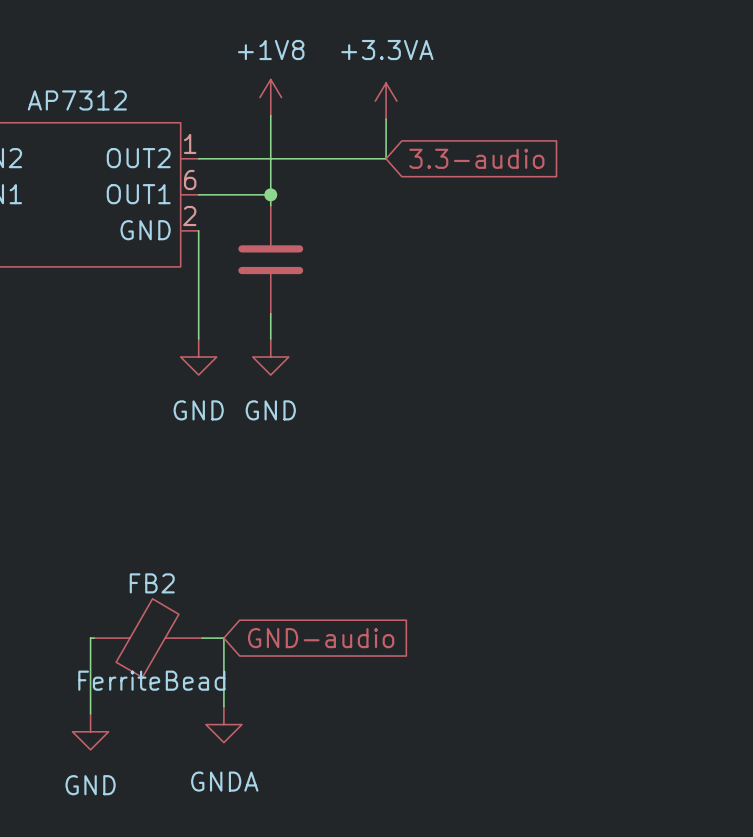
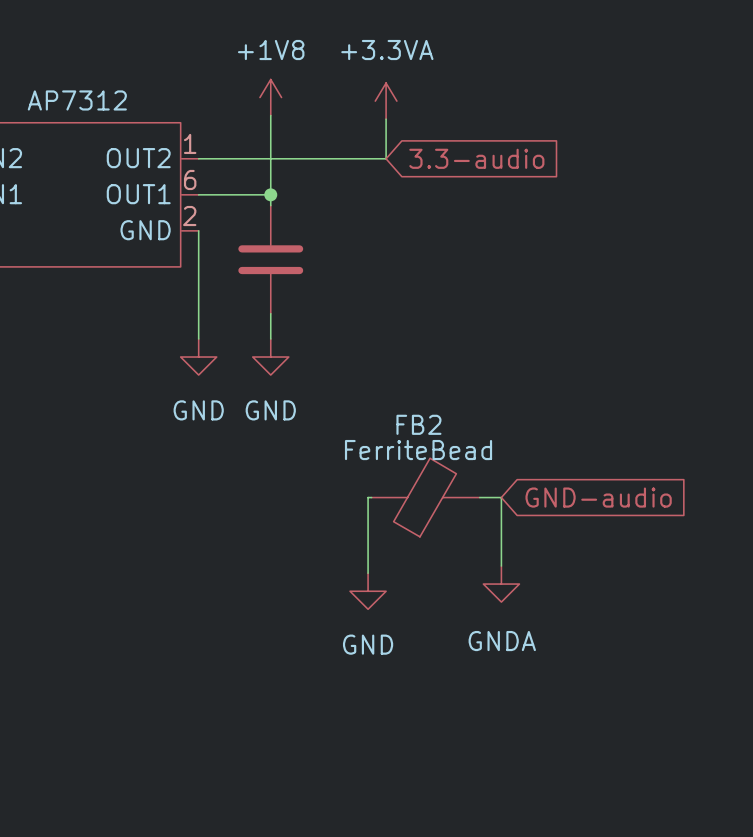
FB2 name position: FB2 (152, 583) -> FB2 (418, 424)
wire: (94, 638) (90, 638) (90, 713) -> (371, 497) (368, 497) (368, 573)
FB2 position: (148, 638) -> (425, 497)
wire: (202, 638) (223, 638) (223, 706) -> (479, 497) (501, 497) (501, 566)
global label position: GND-audio (321, 638) -> GND-audio (598, 497)
FB2 value position: FerriteBead (151, 680) -> FerriteBead (418, 450)
power symbol position: GNDA (223, 724) -> GNDA (501, 584)
power symbol position: GND (90, 731) -> GND (368, 591)

